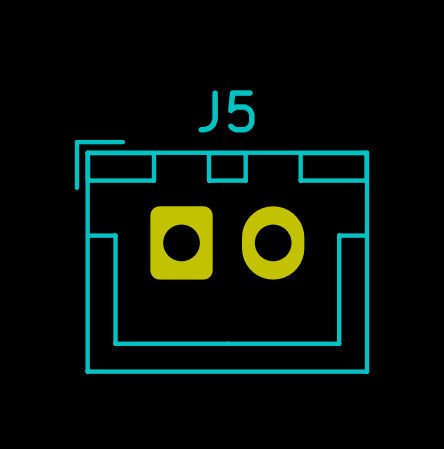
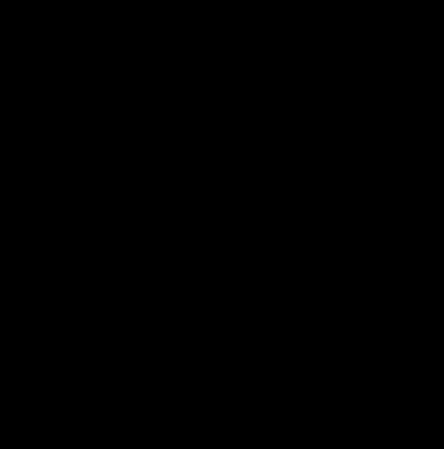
J5: (222, 256) -> none

